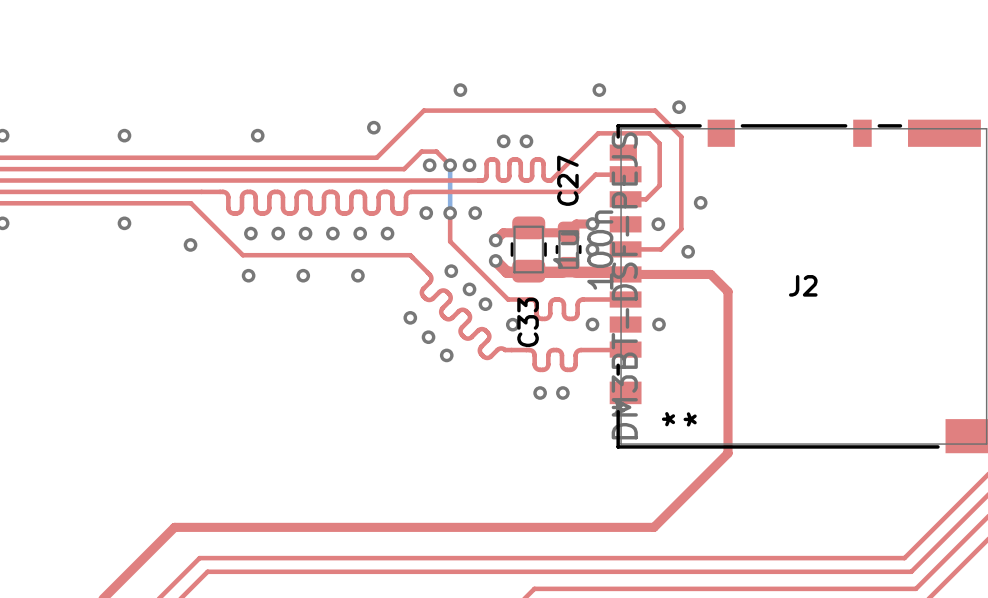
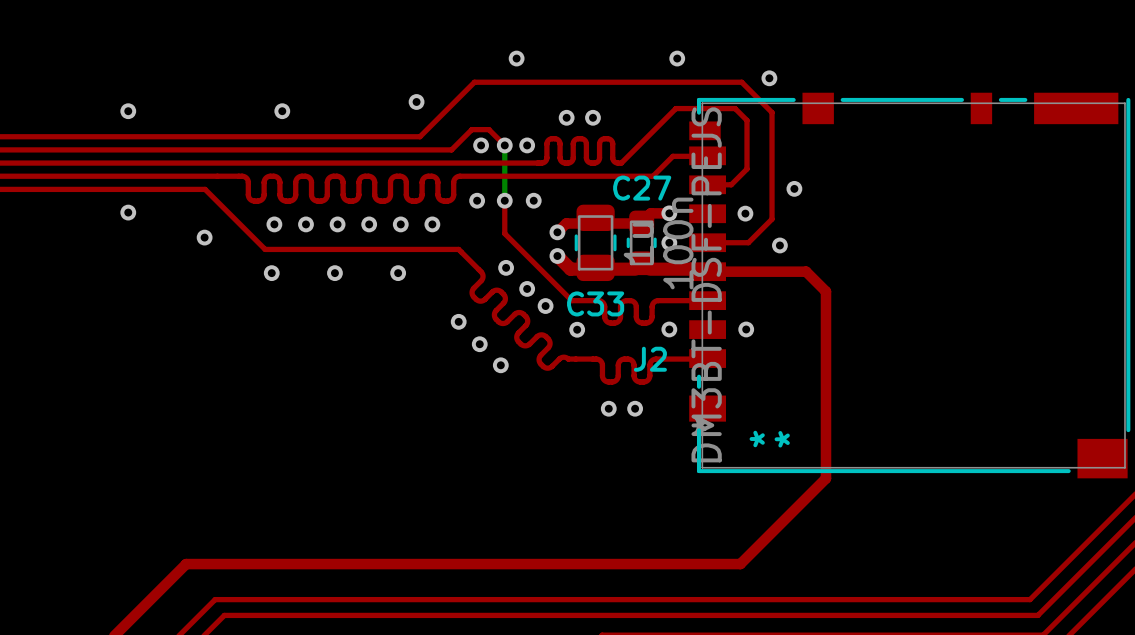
C27 name rotation: 0° (567, 180) -> 90° clockwise (642, 188)
J2 name position: J2 (803, 285) -> J2 (650, 359)
C33 name rotation: 0° (528, 322) -> 90° clockwise (595, 303)

